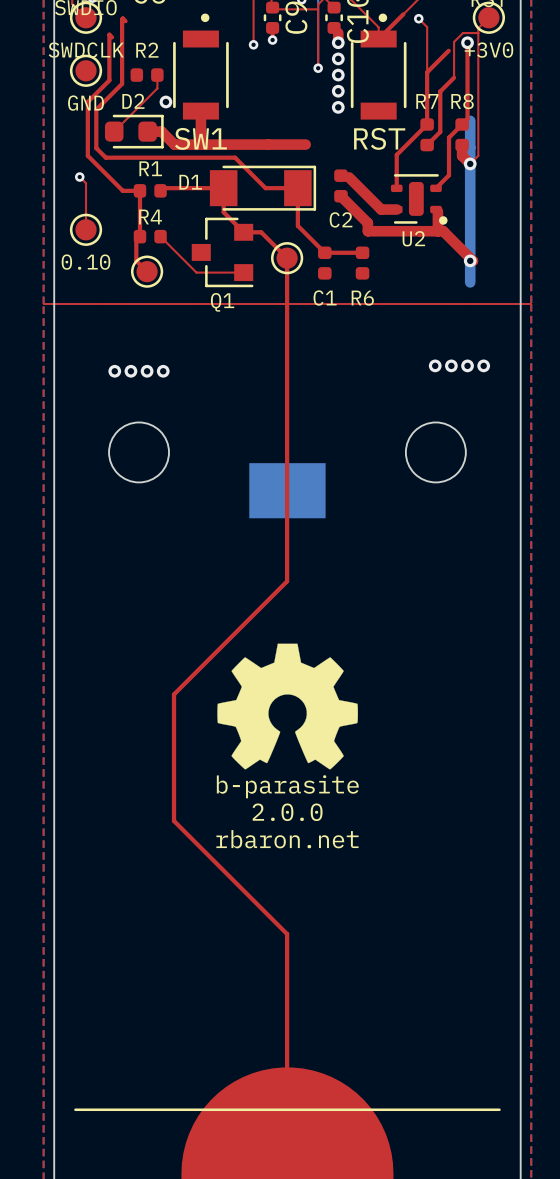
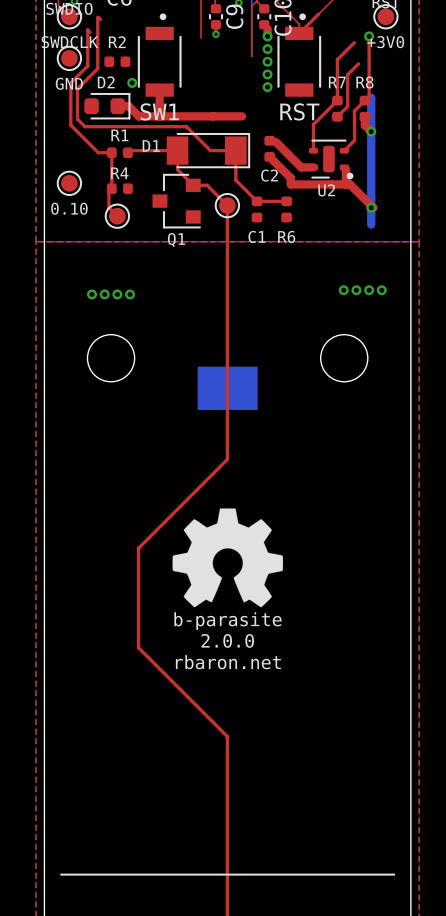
top track: (272, 7) (274, 9) (318, 9) -> none
top track: (488, 17) (478, 28) (478, 155) (470, 163) -> none
top track: (418, 18) (427, 27) (427, 72) -> none
via: (418, 18) -> none
top track: (478, 33) (462, 33) (454, 41) (454, 77) -> none
via: (253, 44) -> none
via: (318, 68) -> none
top track: (157, 75) (157, 88) (114, 131) -> none
top track: (79, 177) (86, 183) (86, 229) -> none
via: (79, 177) -> none
top track: (160, 236) (196, 272) (243, 272) -> none

